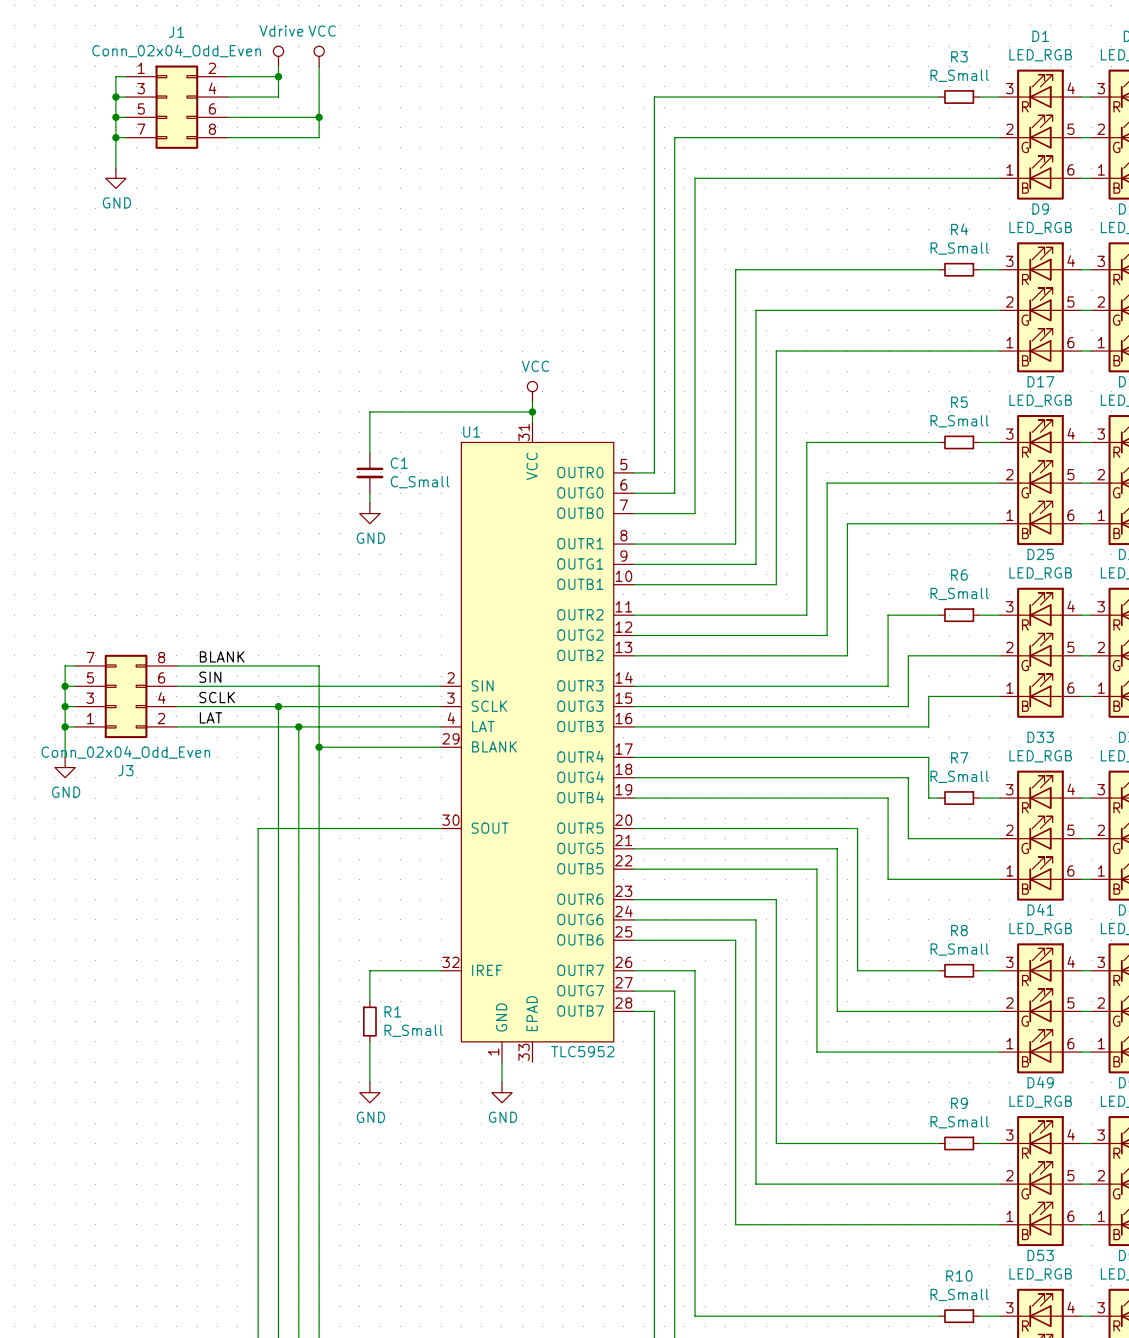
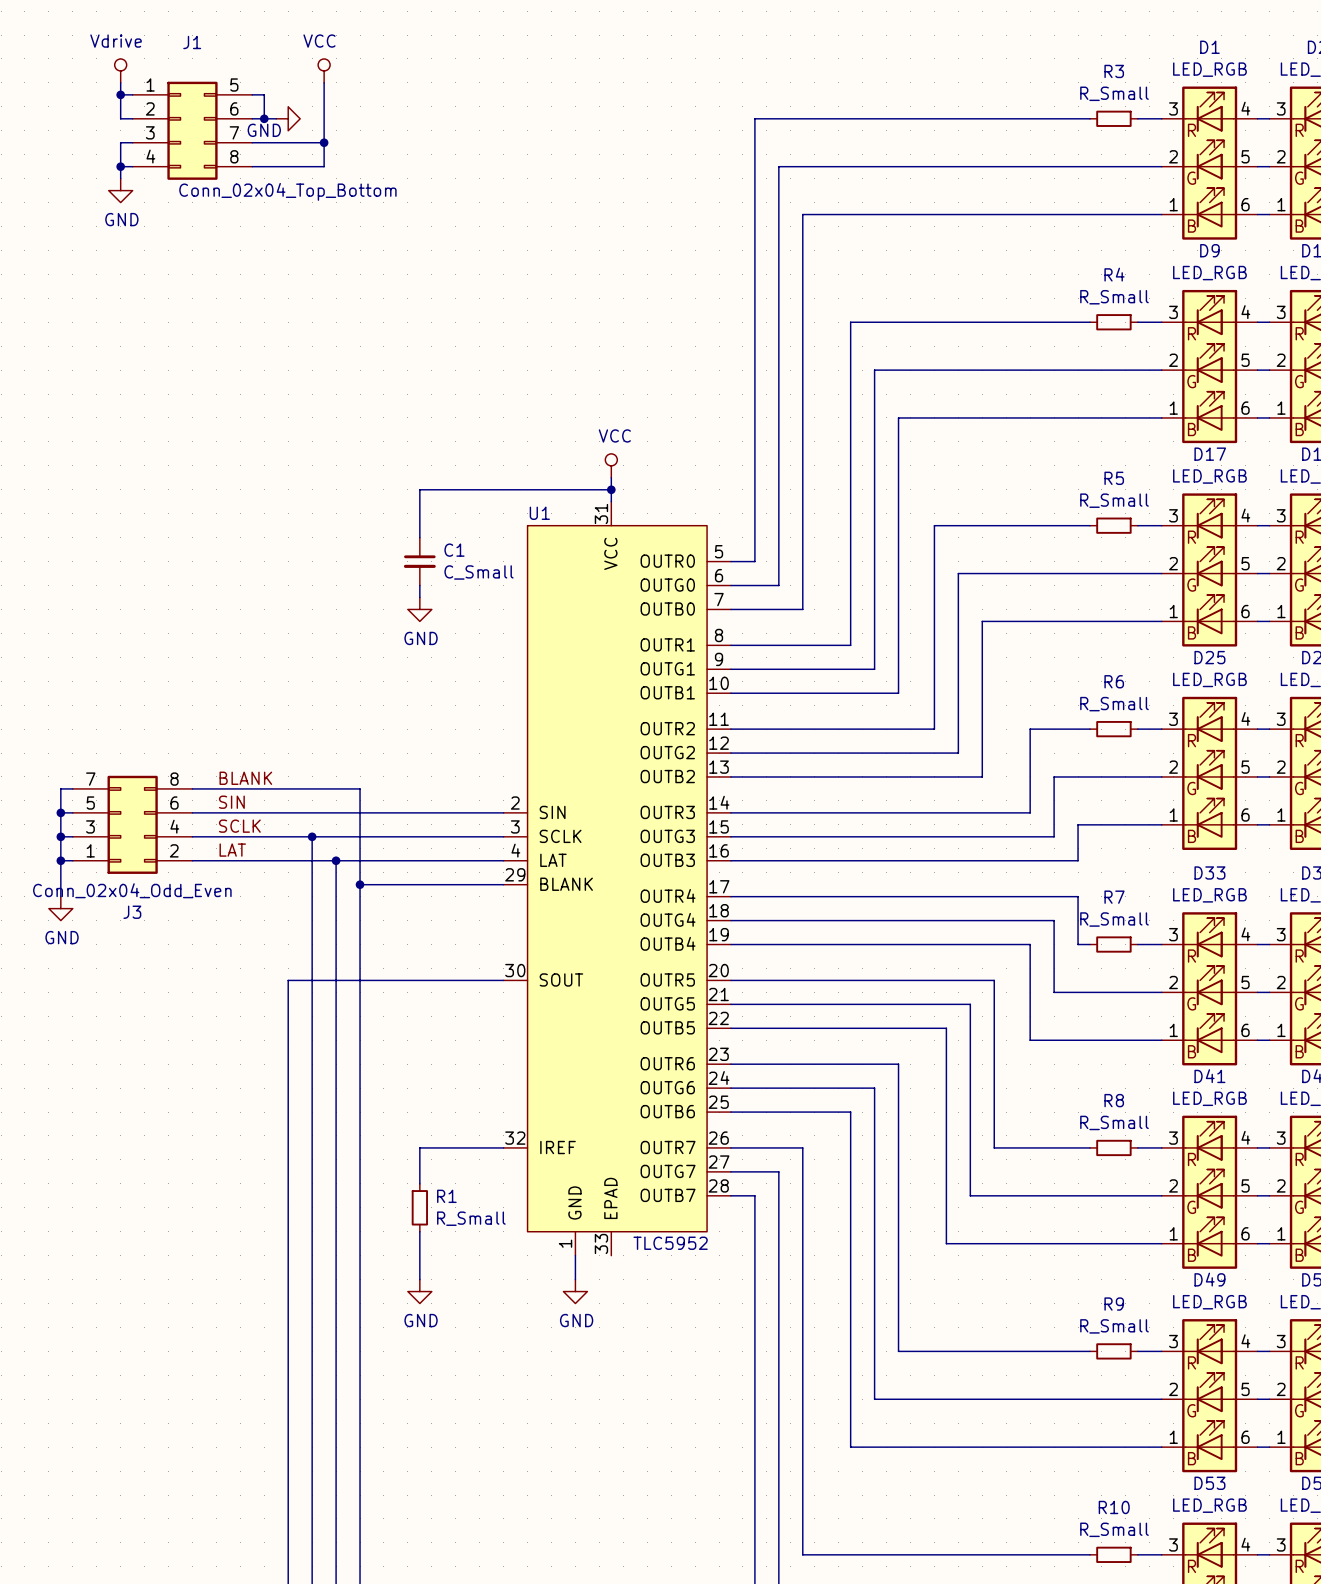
power symbol text position: Vdrive (281, 31) -> Vdrive (116, 41)
power symbol text position: VCC (322, 31) -> VCC (319, 41)
J1 value: Conn_02x04_Odd_Even (176, 50) -> Conn_02x04_Top_Bottom (287, 191)
power symbol position: Vdrive (278, 56) -> Vdrive (120, 70)
power symbol position: VCC (319, 56) -> VCC (324, 70)
wire: none -> (120, 82) (120, 94)
wire: (278, 66) (278, 97) (247, 97) -> none
wire: (319, 66) (319, 137) (288, 137) -> (324, 82) (324, 166)
J1 pin number: 2 (212, 68) -> 5 (234, 85)
junction: none -> (120, 94)
wire: (237, 76) (278, 76) -> (264, 94) (264, 118)
junction: (278, 76) -> none
J1 pin number: 3 (141, 88) -> 2 (150, 108)
J1 pin number: 4 (212, 88) -> 6 (234, 108)
wire: (115, 97) (115, 117) -> none
junction: (115, 97) -> none
junction: none -> (264, 118)
power symbol: none -> GND (288, 118)
J1 pin number: 5 (141, 108) -> 3 (150, 132)
J1 pin number: 6 (212, 108) -> 7 (234, 132)
junction: (115, 117) -> none
wire: (288, 117) (319, 117) -> none
junction: none -> (324, 142)
junction: (319, 117) -> none
J1 pin number: 7 (141, 129) -> 4 (150, 156)
power symbol position: GND (115, 178) -> GND (120, 190)

